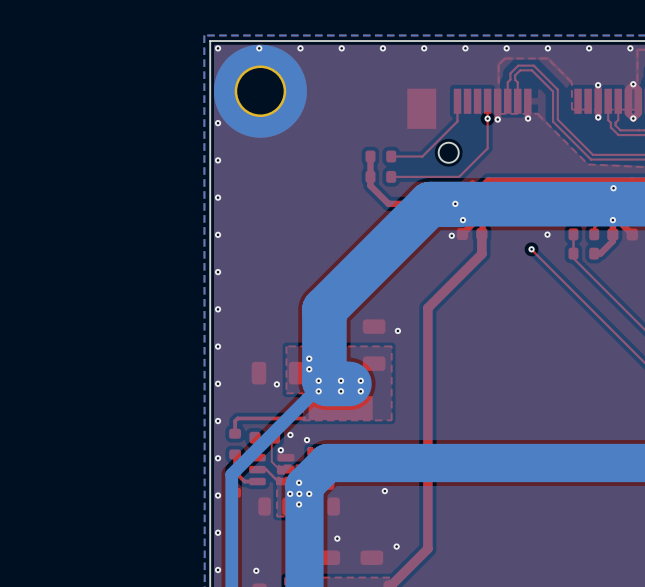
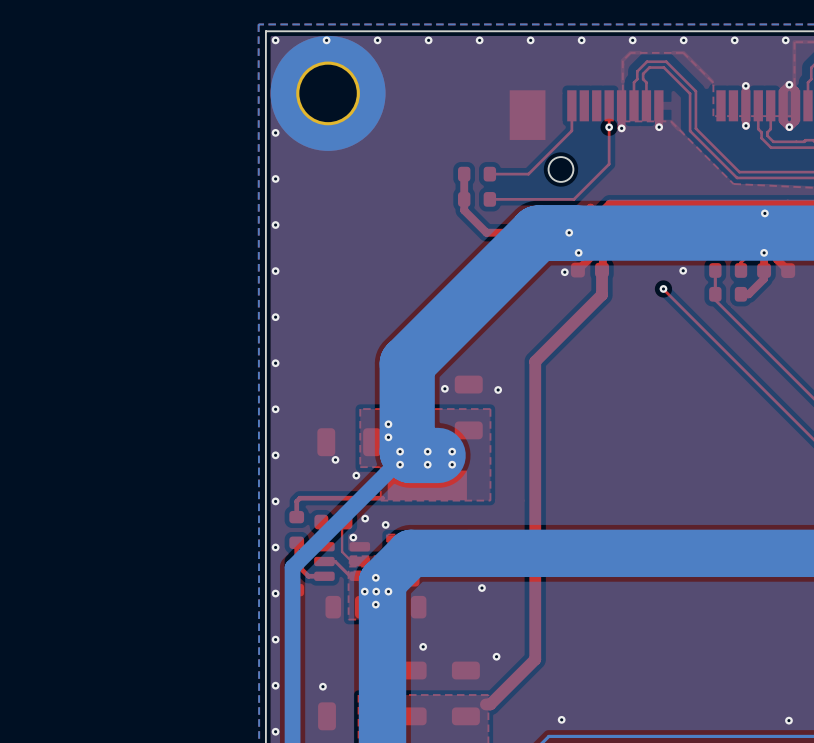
via: none -> (444, 388)
via: (276, 384) -> none
via: none -> (335, 459)
via: none -> (356, 475)

